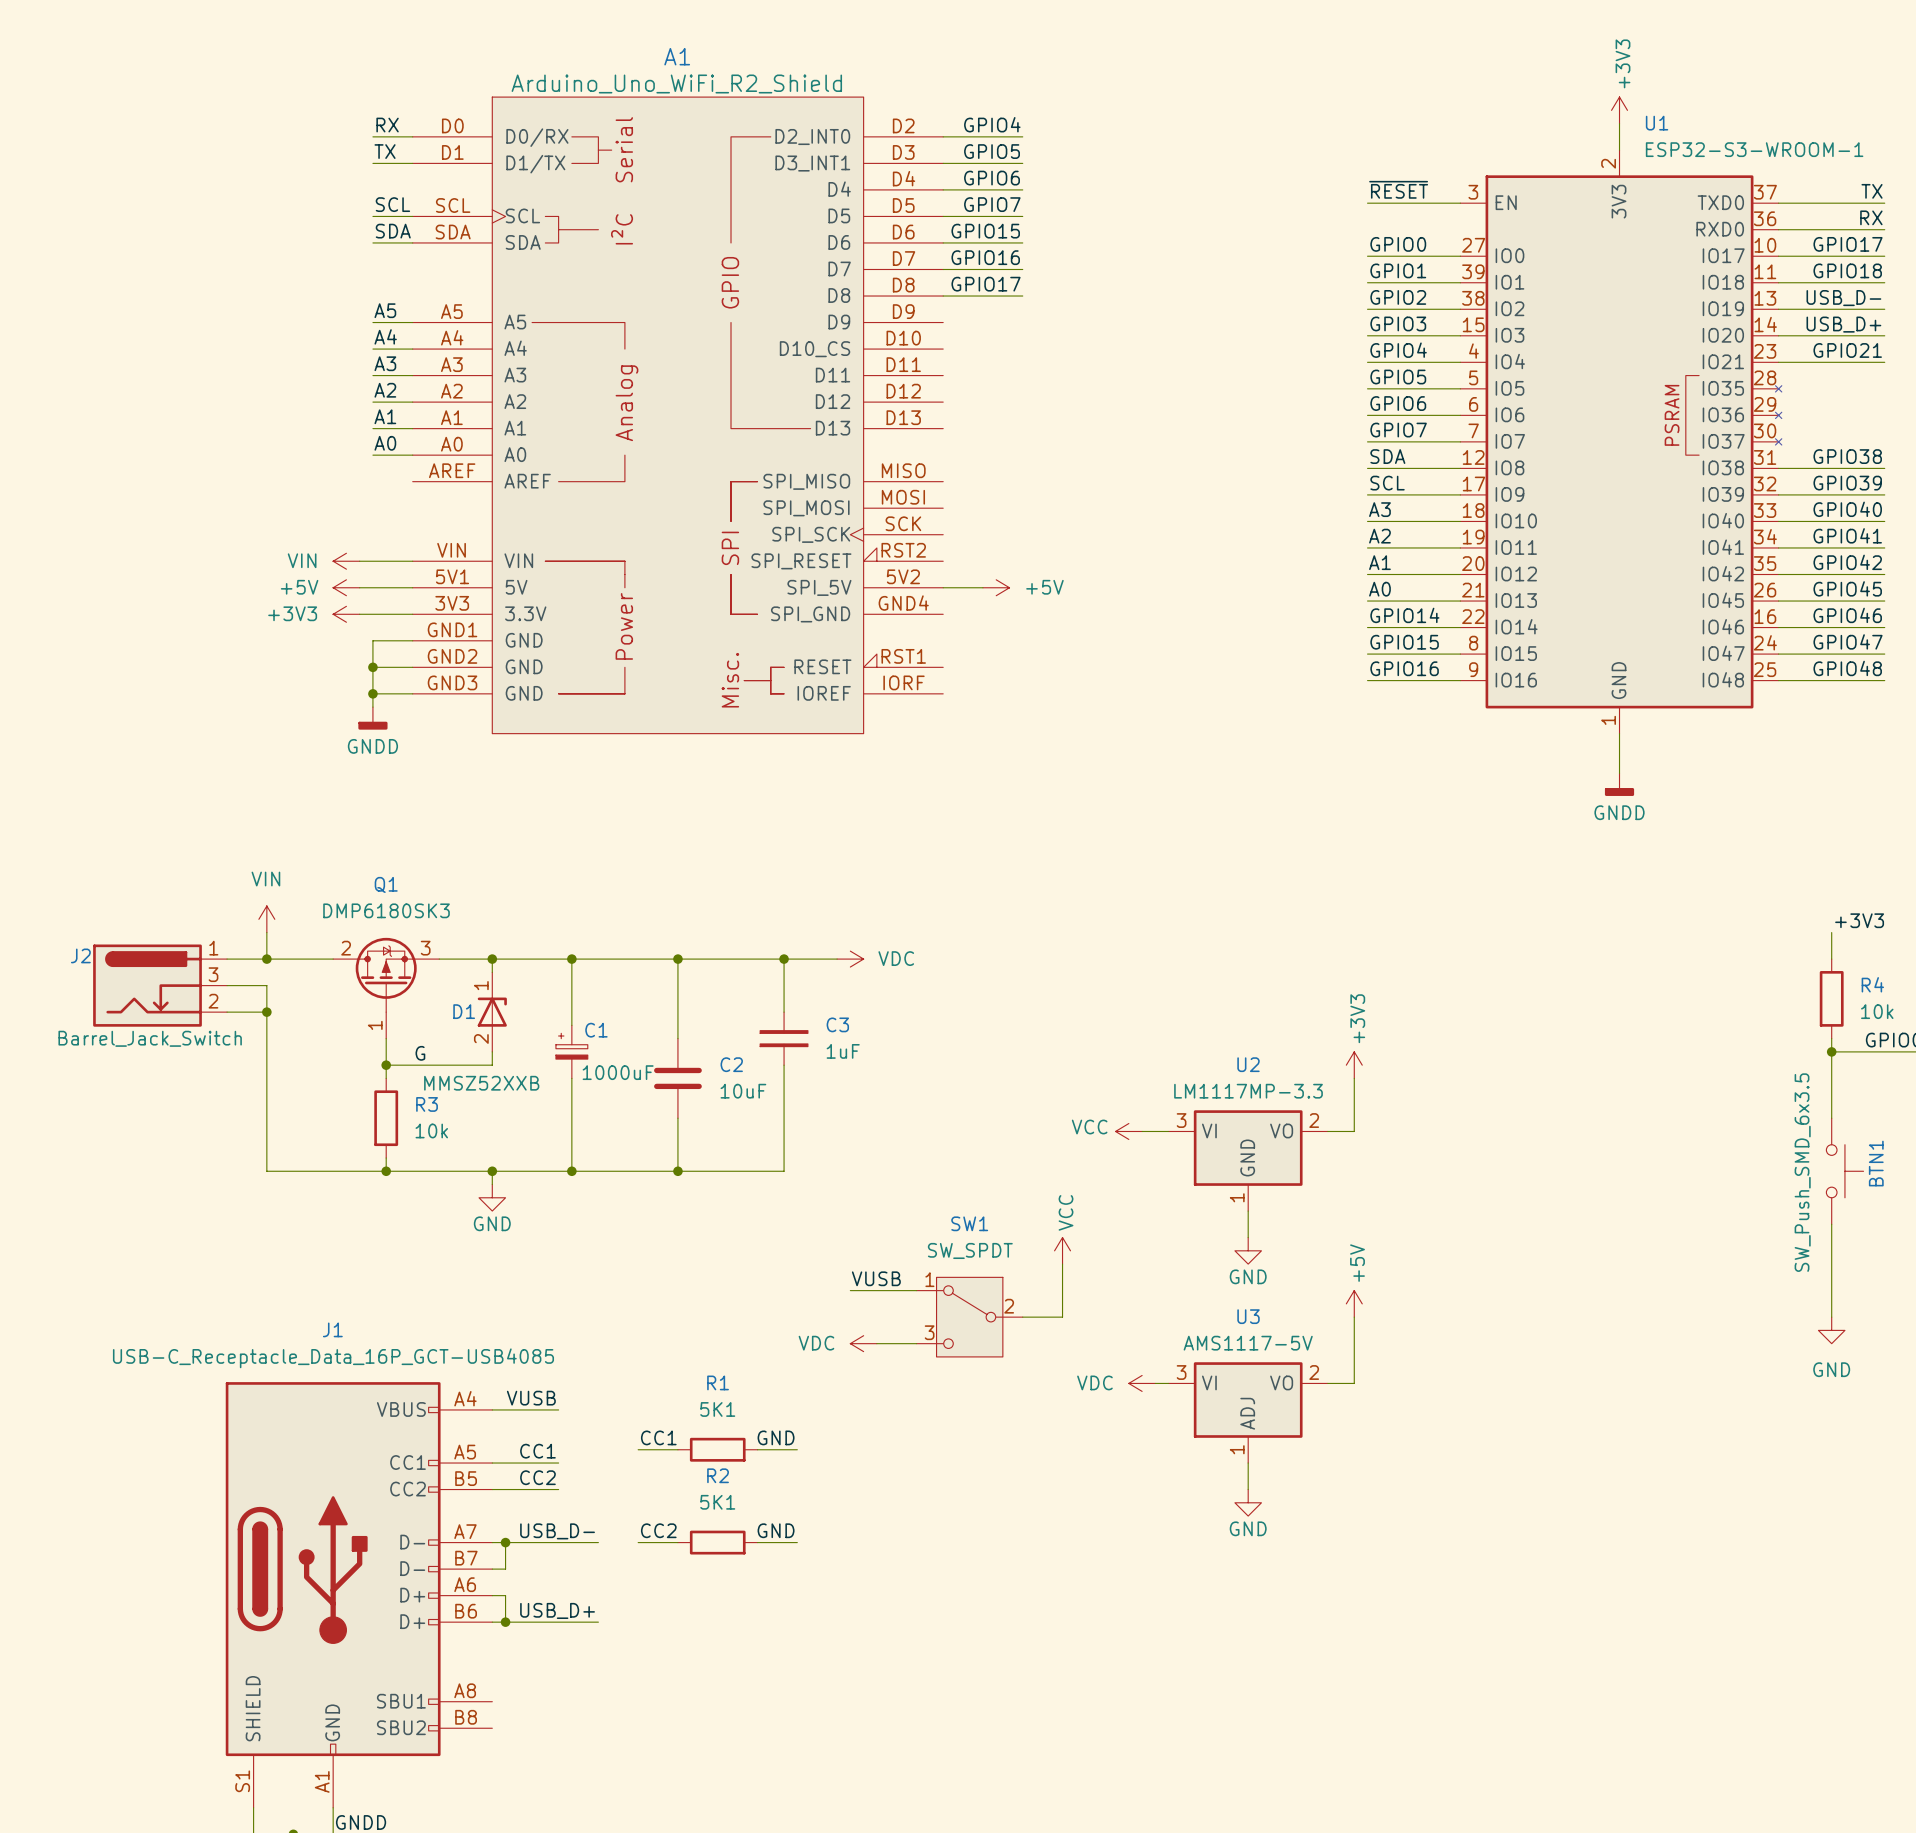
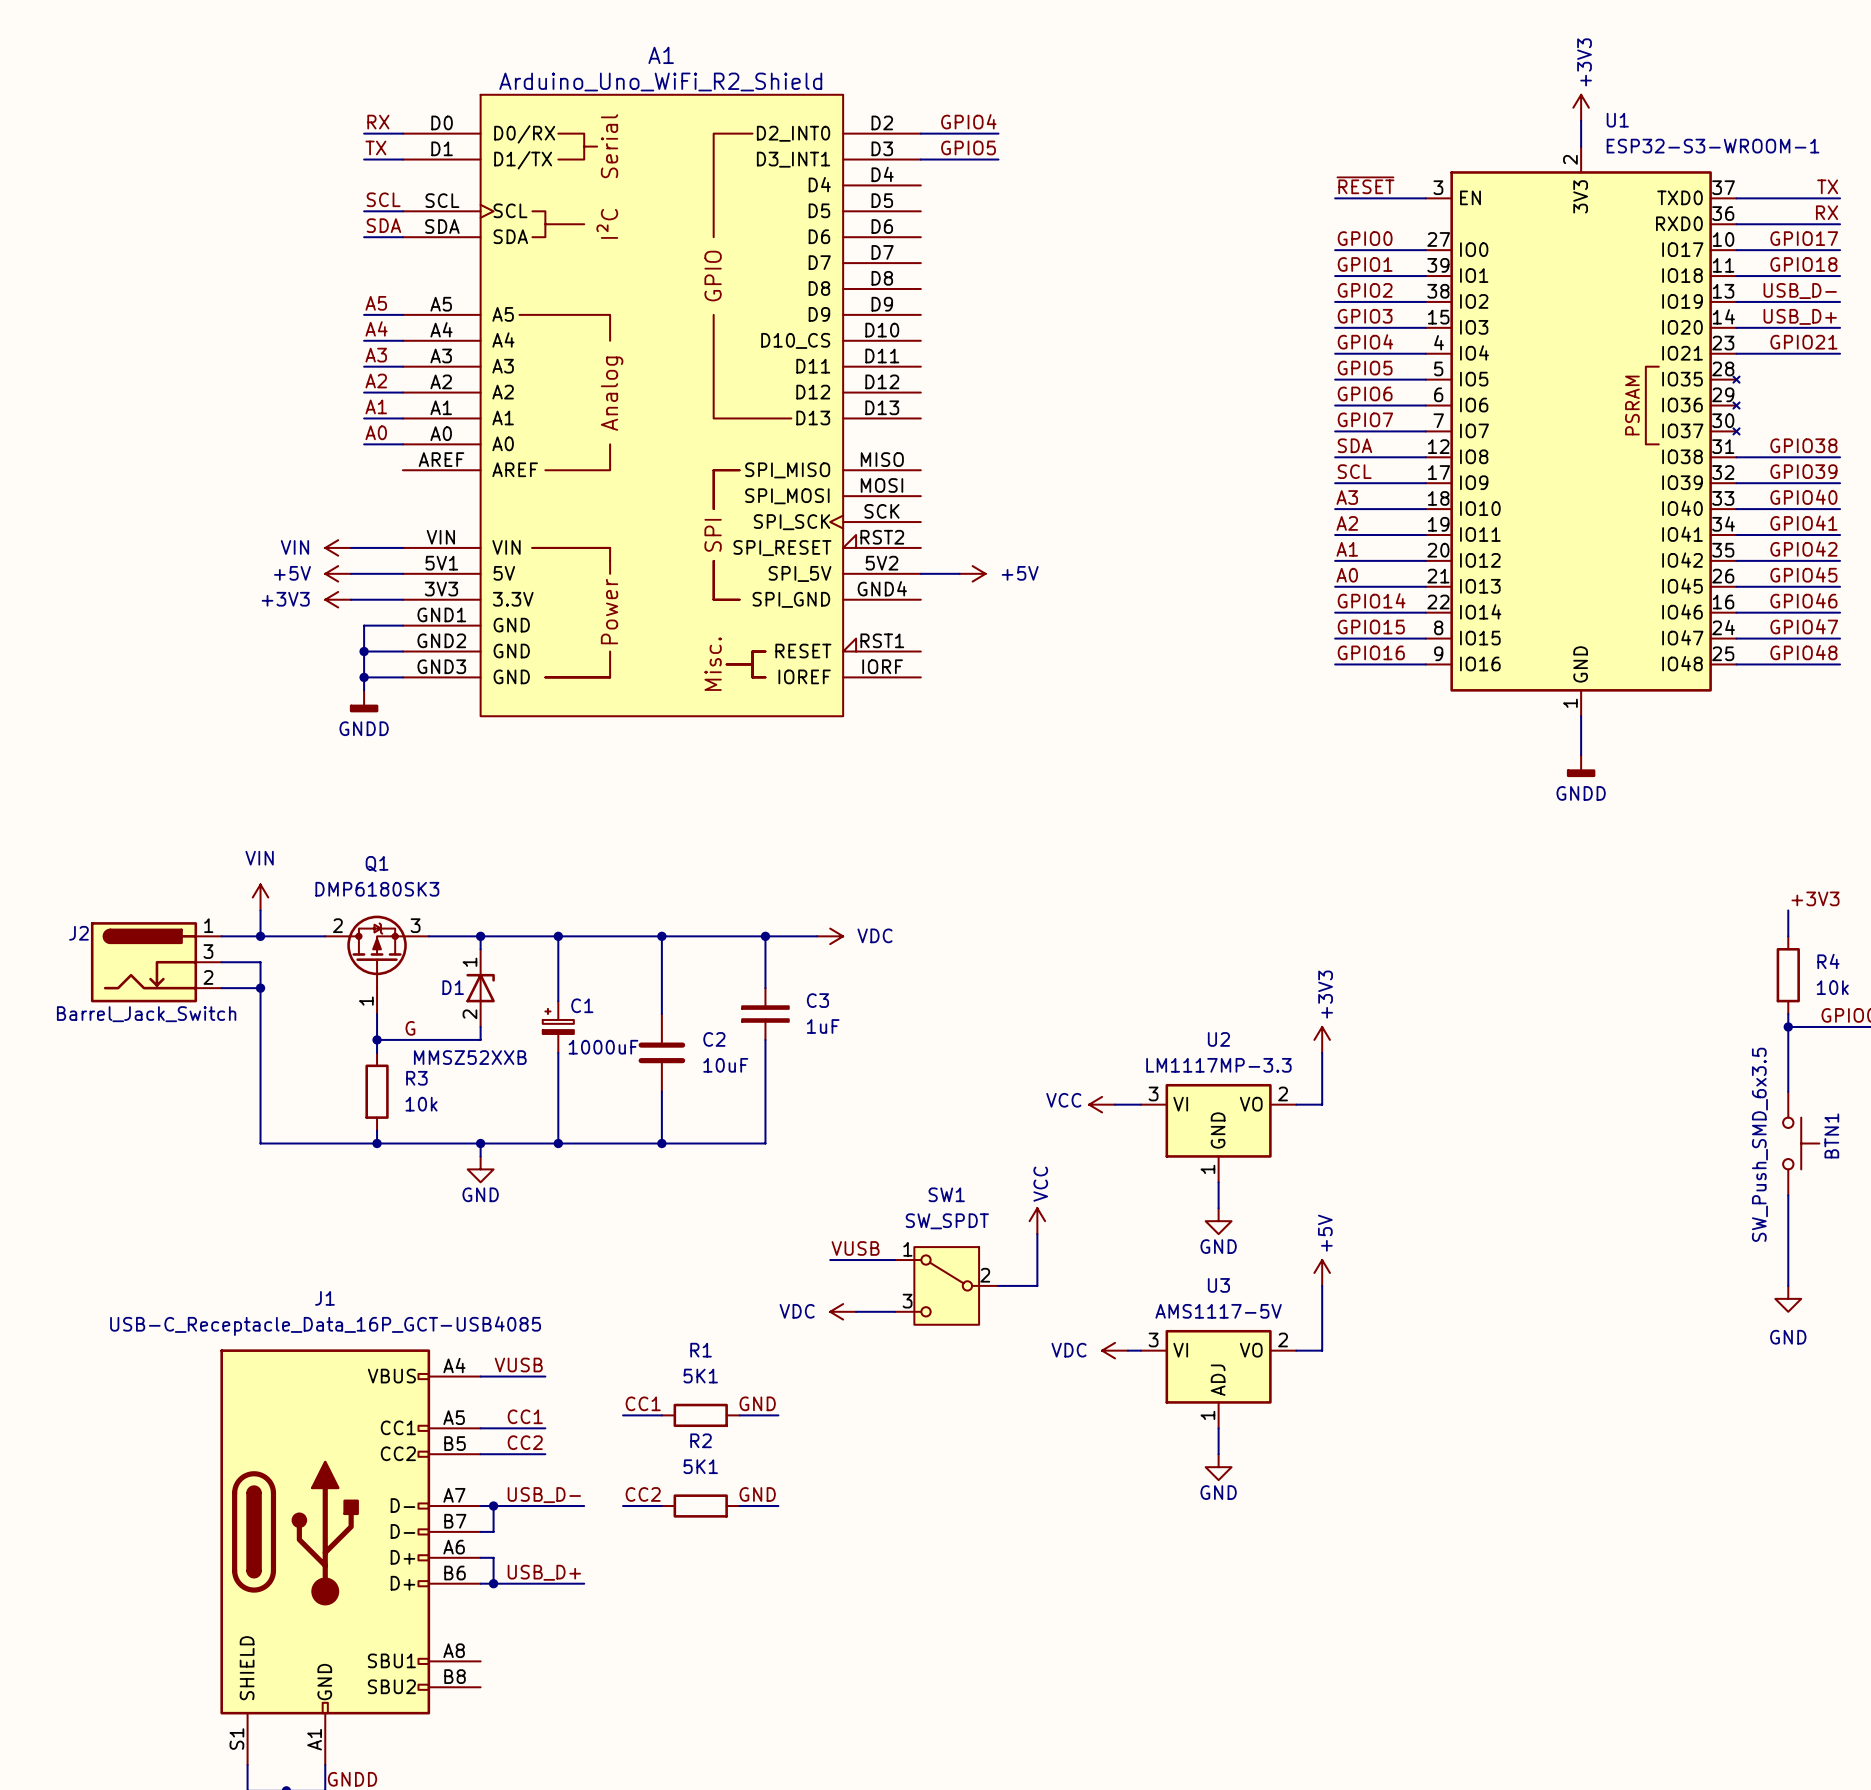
label: GPIO6 (992, 178) -> none
wire: (943, 189) (1022, 189) -> none
label: GPIO7 (992, 204) -> none
wire: (943, 216) (1022, 216) -> none
label: GPIO15 (985, 231) -> none
wire: (943, 242) (1022, 242) -> none
label: GPIO16 (985, 257) -> none
wire: (943, 269) (1022, 269) -> none
label: GPIO17 (986, 284) -> none
wire: (943, 296) (1022, 296) -> none

